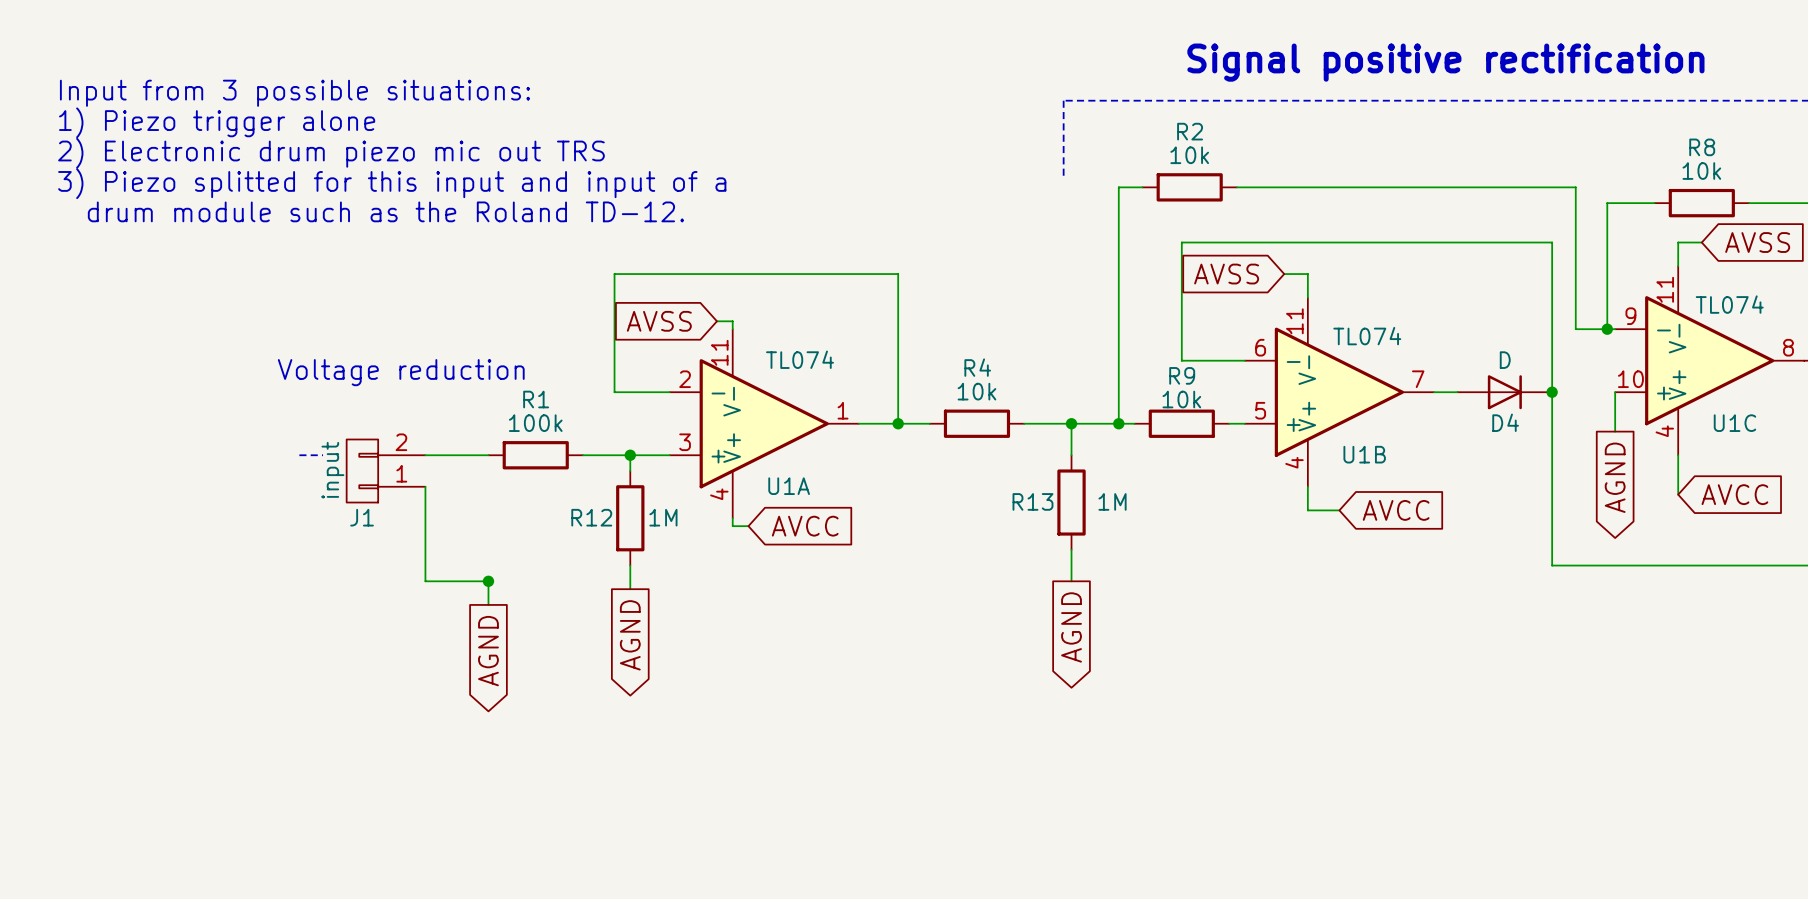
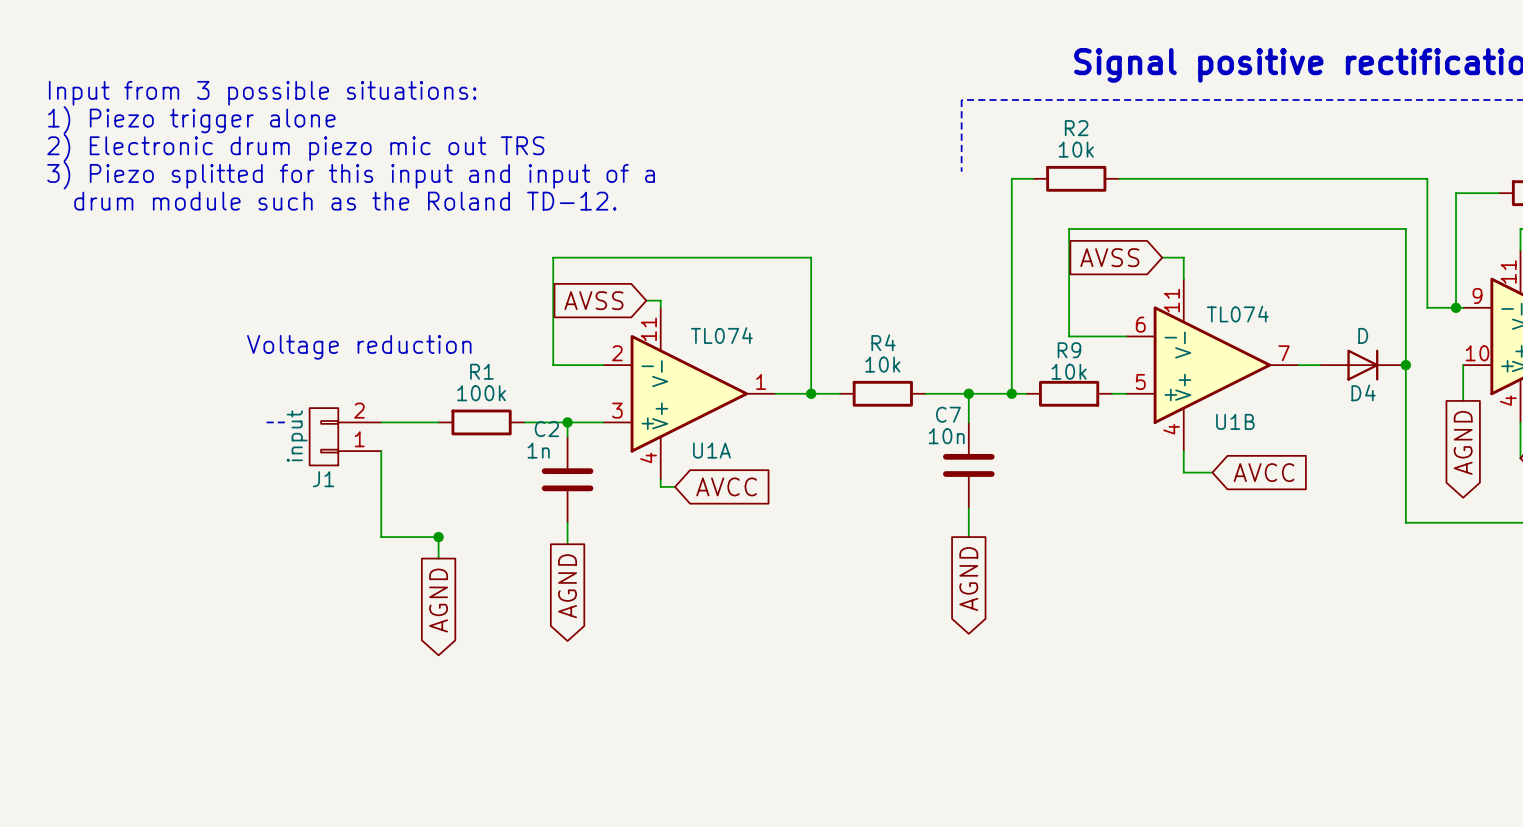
R13: 1M (1071, 502) -> none
C7: none -> 10n (968, 465)
R12: 1M (630, 518) -> none
C2: none -> 1n (567, 479)

